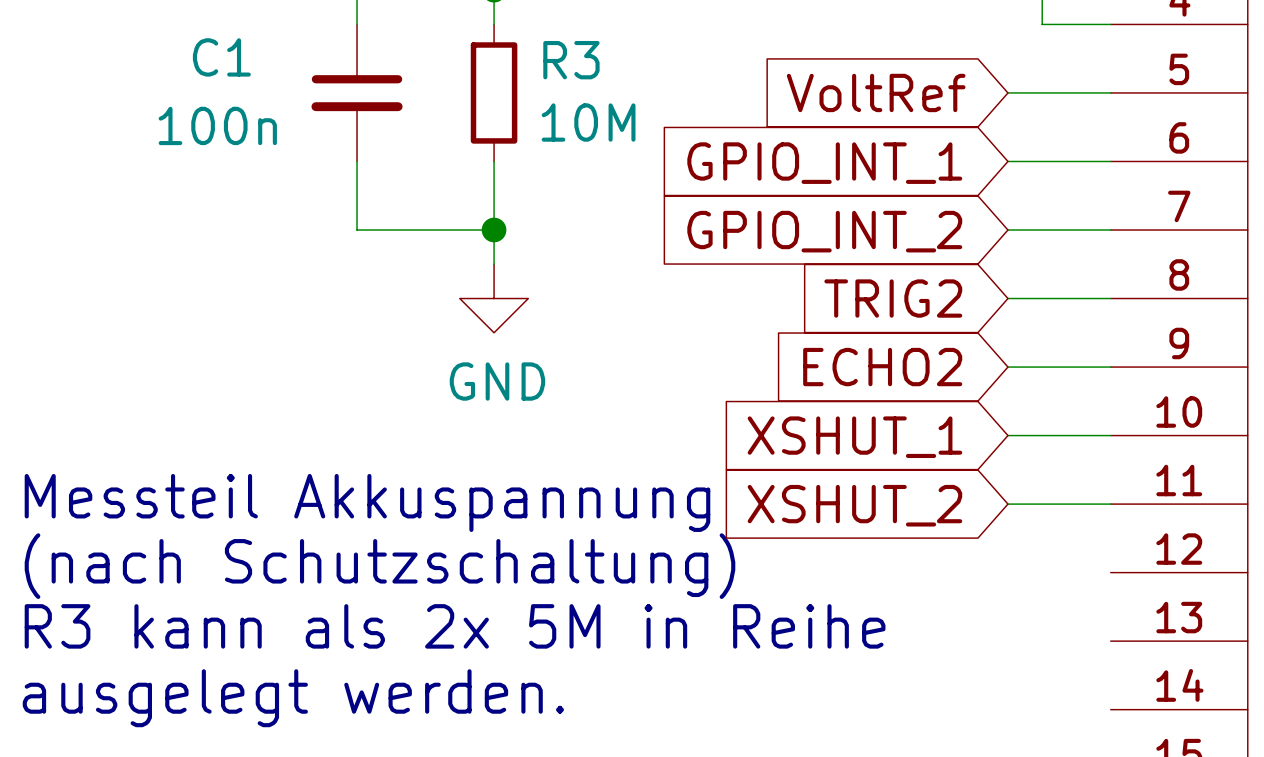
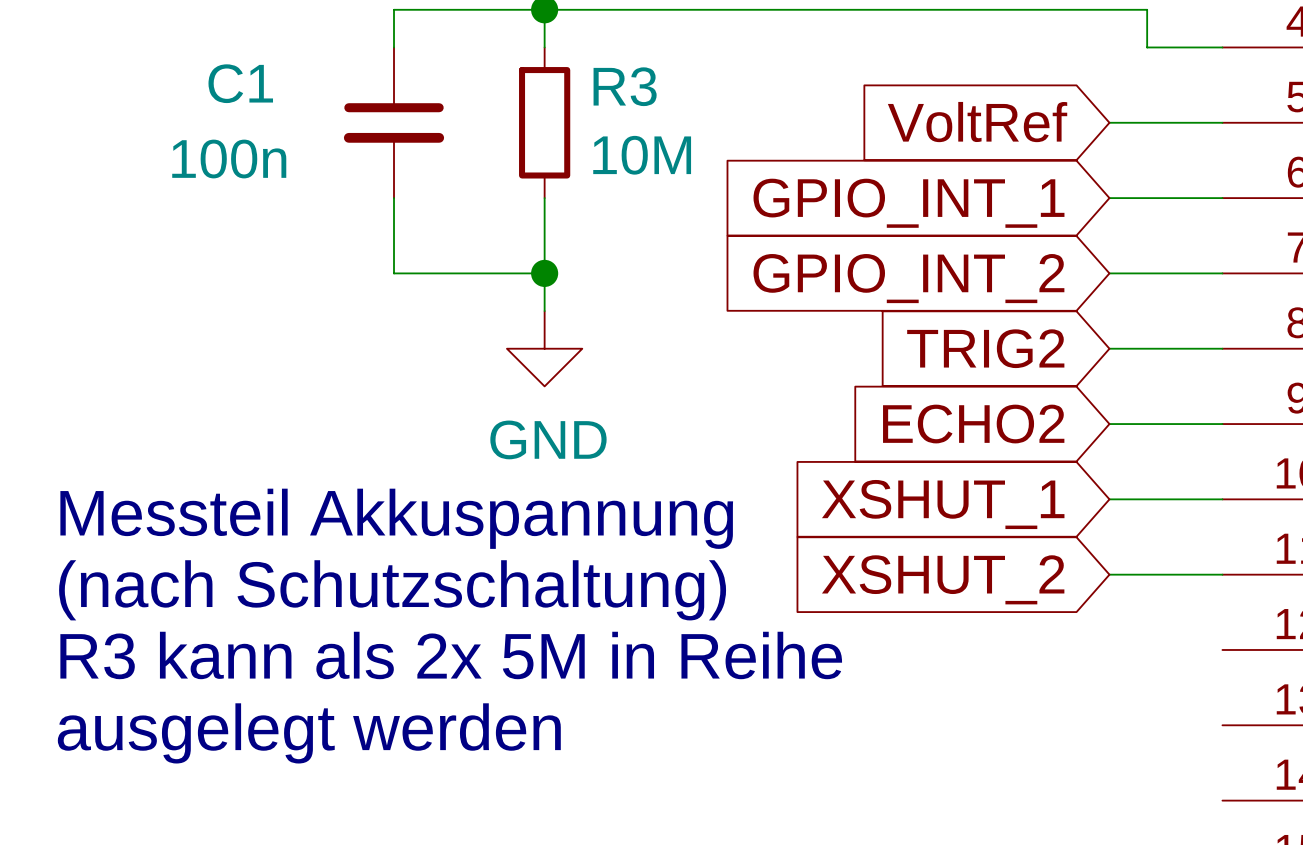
text position: Messteil Akkuspannung (367, 502) -> Messteil Akkuspannung (396, 518)
text position: (nach Schutzschaltung) (379, 566) -> (nach Schutzschaltung) (392, 590)
text position: R3 kann als 2x 5M in Reihe (455, 626) -> R3 kann als 2x 5M in Reihe (451, 655)
text: ausgelegt werden. (293, 698) -> ausgelegt werden (309, 733)

